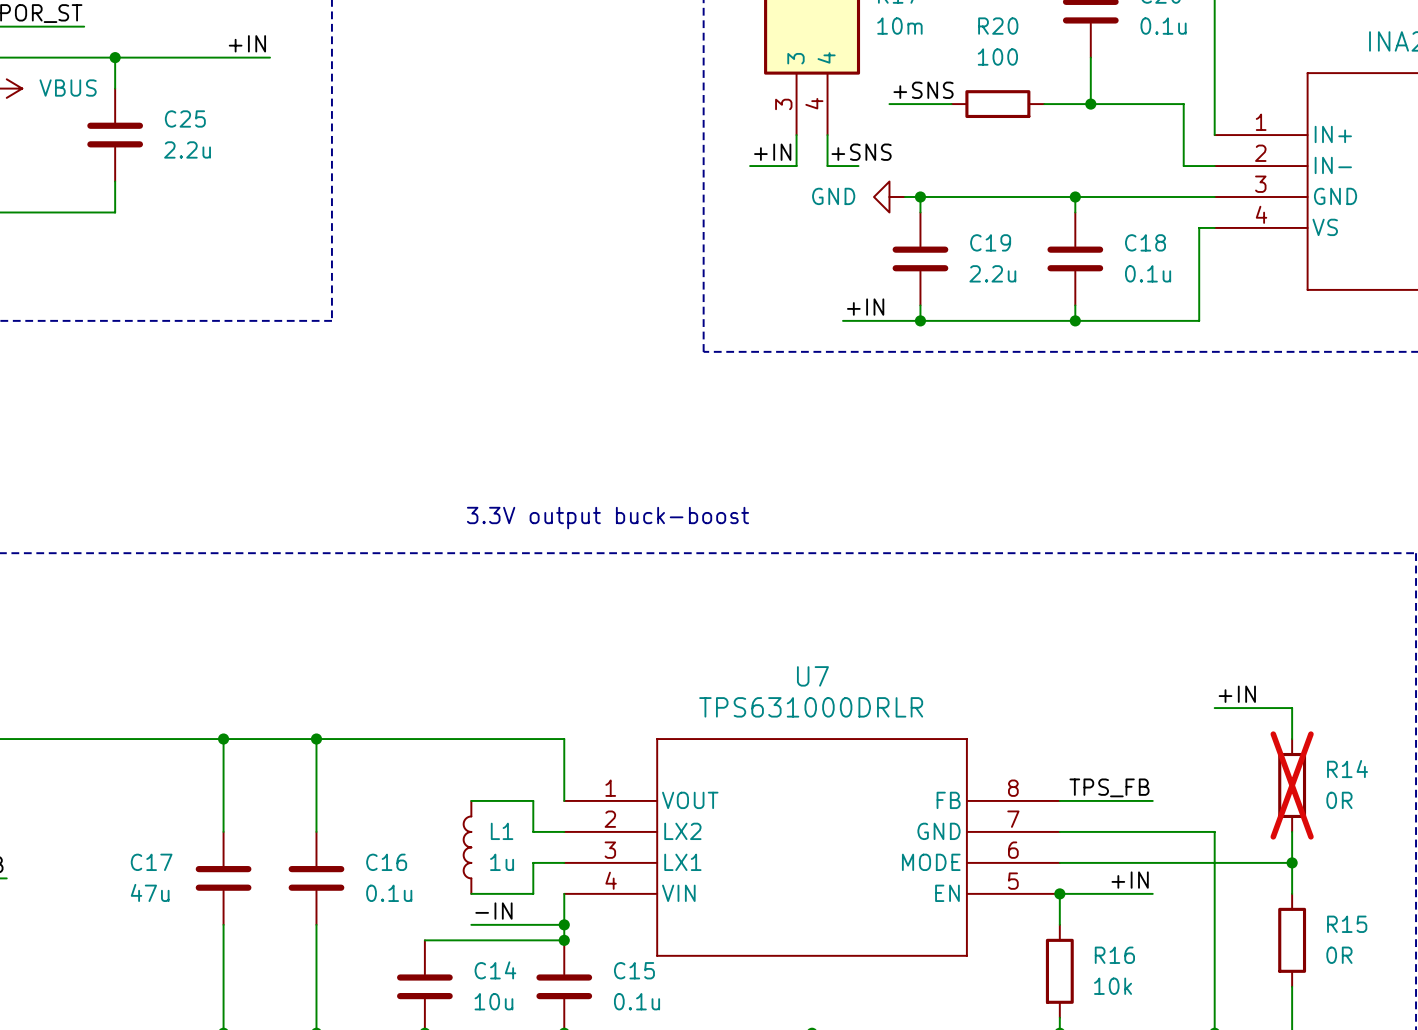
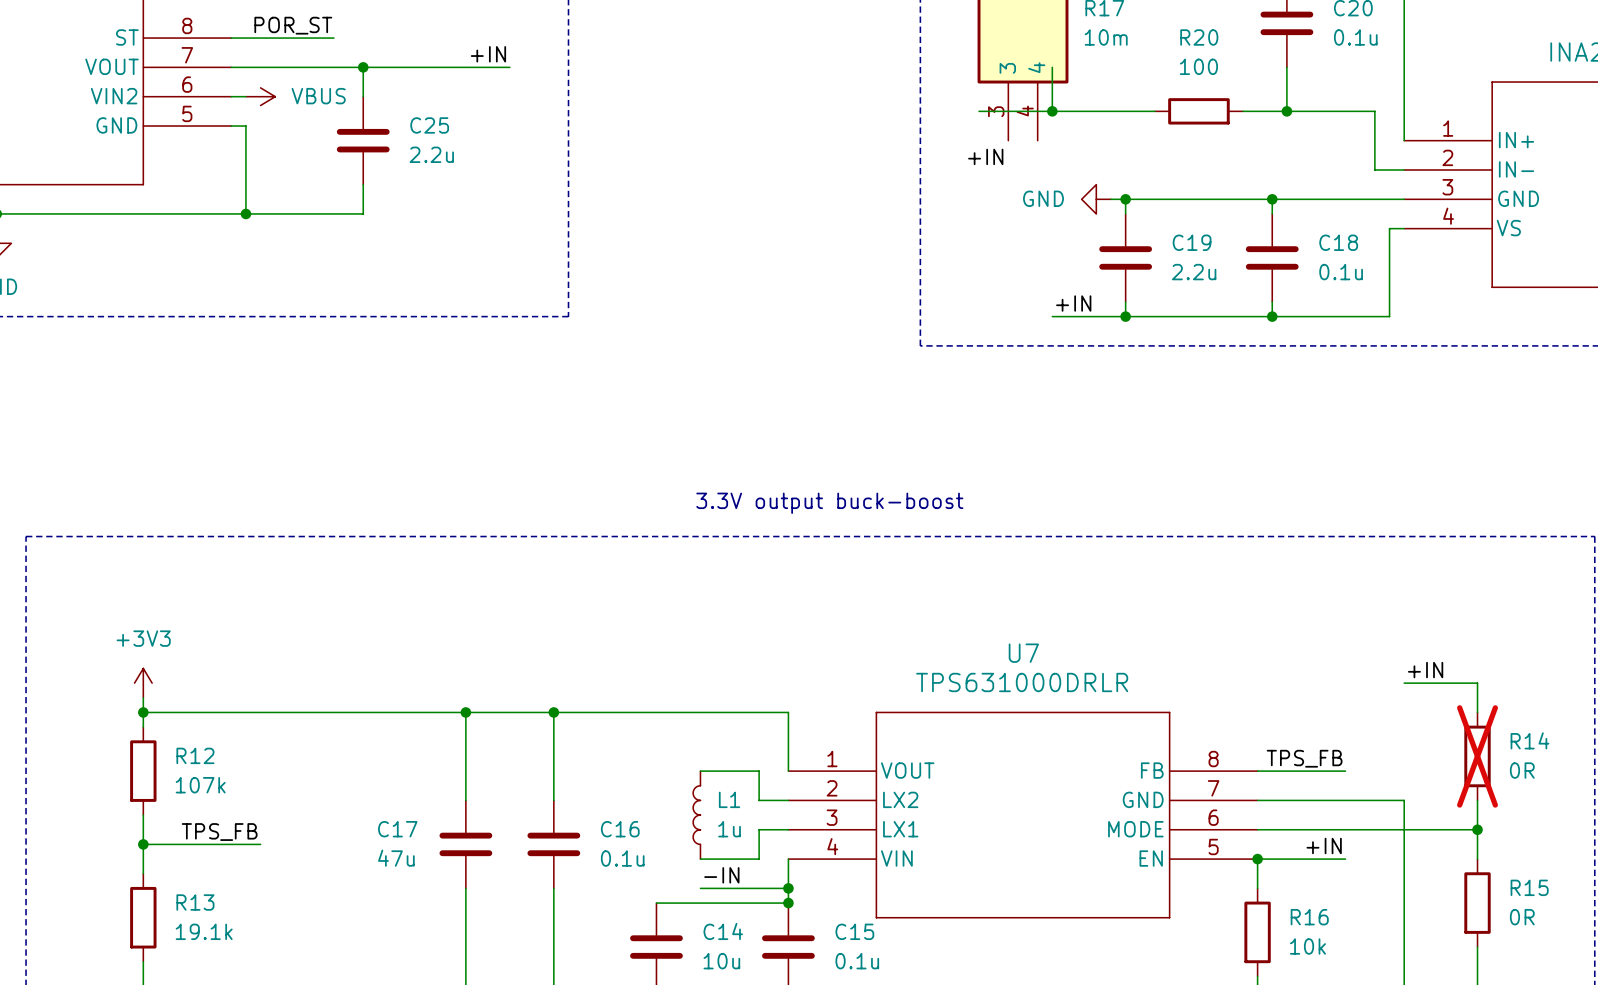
wire: none -> (1052, 67) (1052, 111)
label: +SNS (923, 90) -> none
wire: none -> (979, 111) (1096, 111)
junction: none -> (1052, 111)
wire: (796, 135) (796, 166) (750, 166) -> none
wire: (827, 135) (827, 166) (858, 166) -> none
label: +SNS (861, 152) -> none

